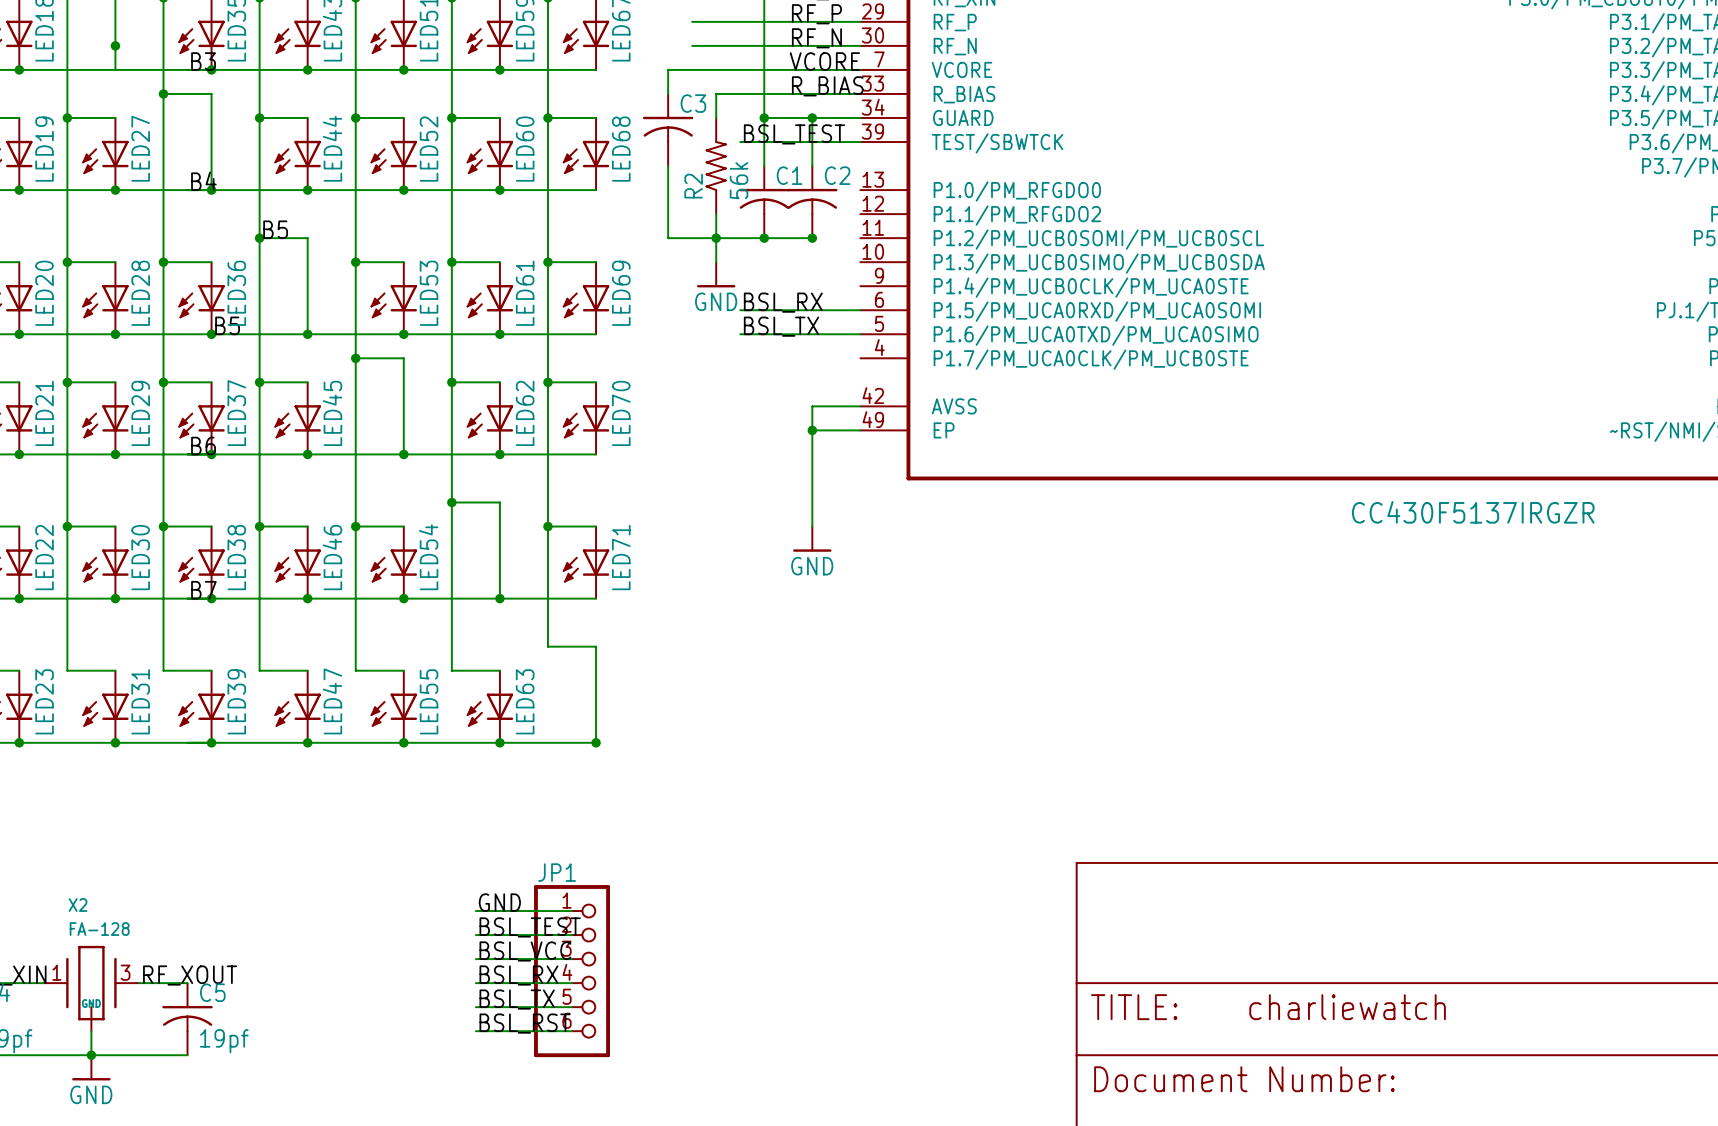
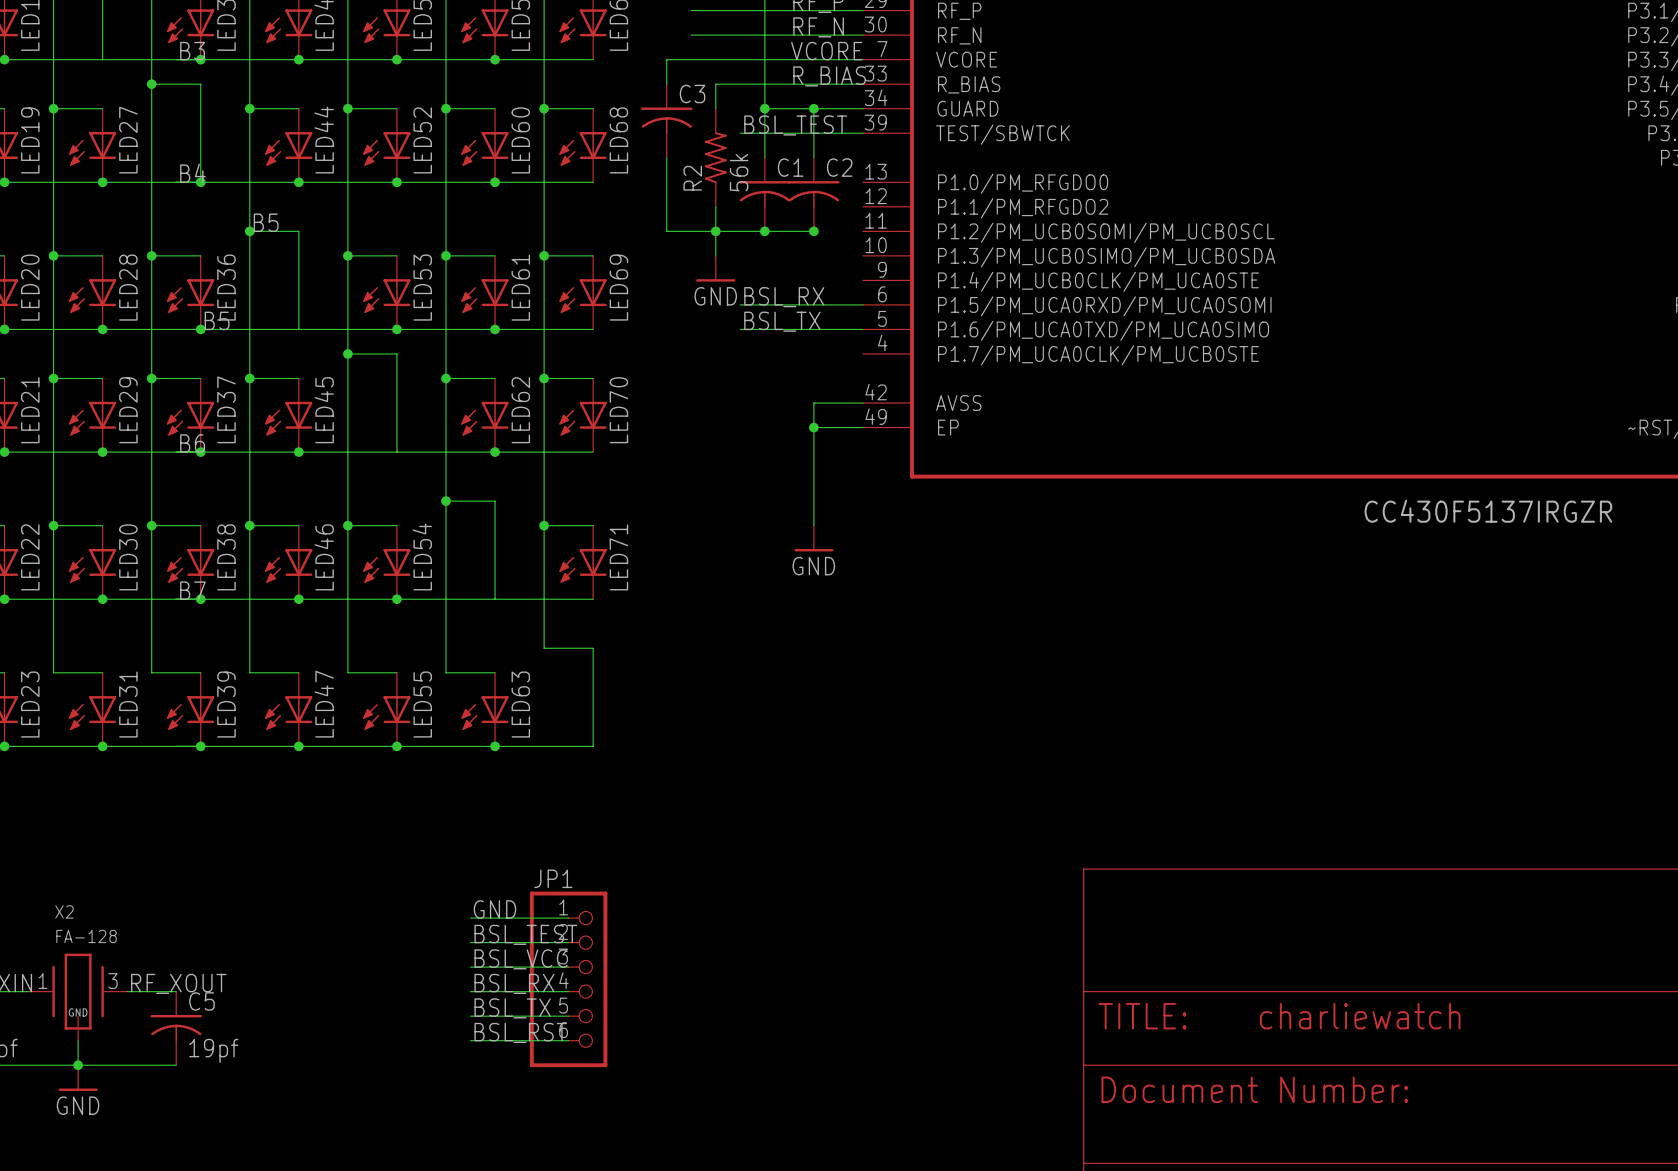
junction: (115, 45) -> none
junction: (307, 334) -> none
junction: (403, 454) -> none
junction: (499, 598) -> none
junction: (596, 742) -> none

